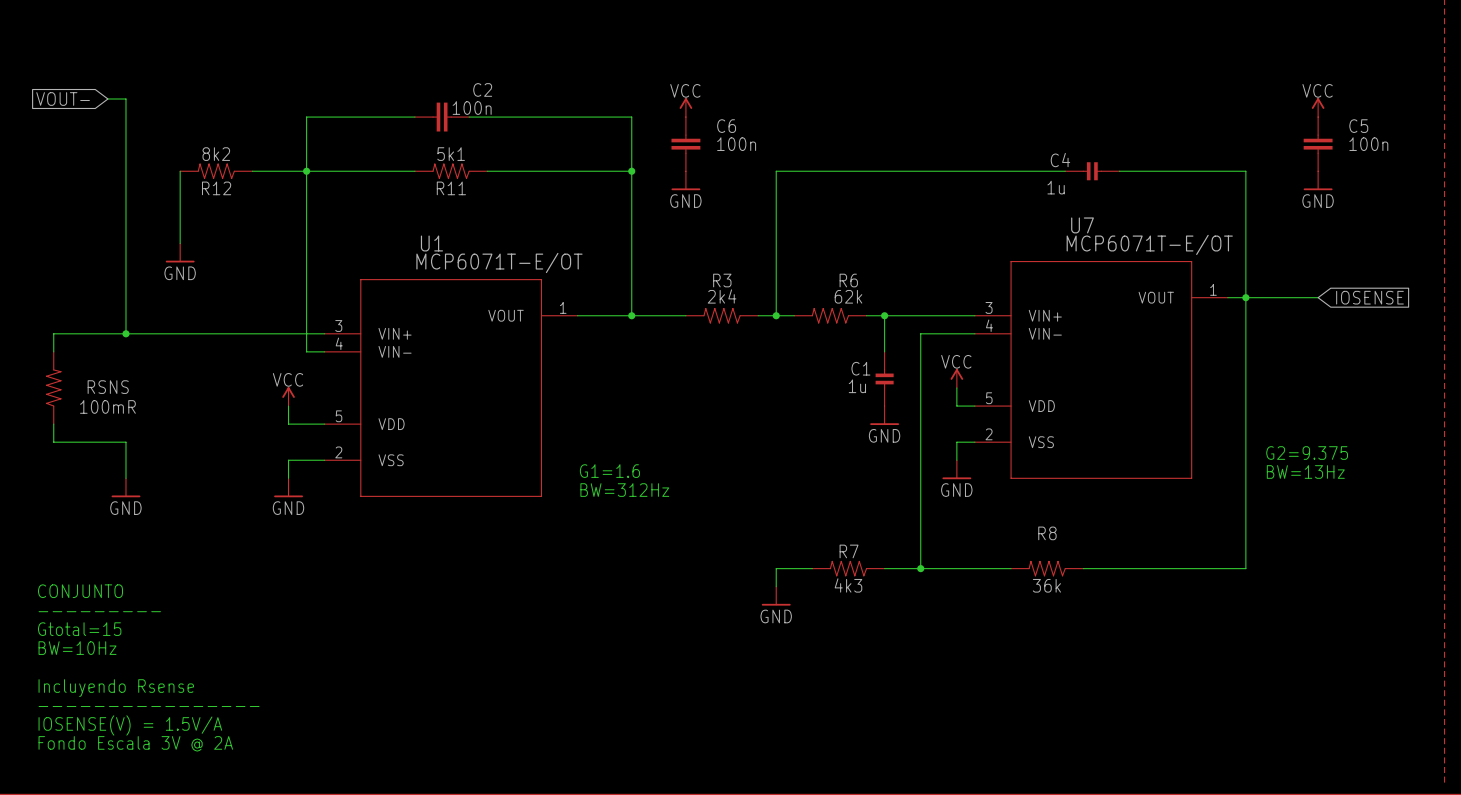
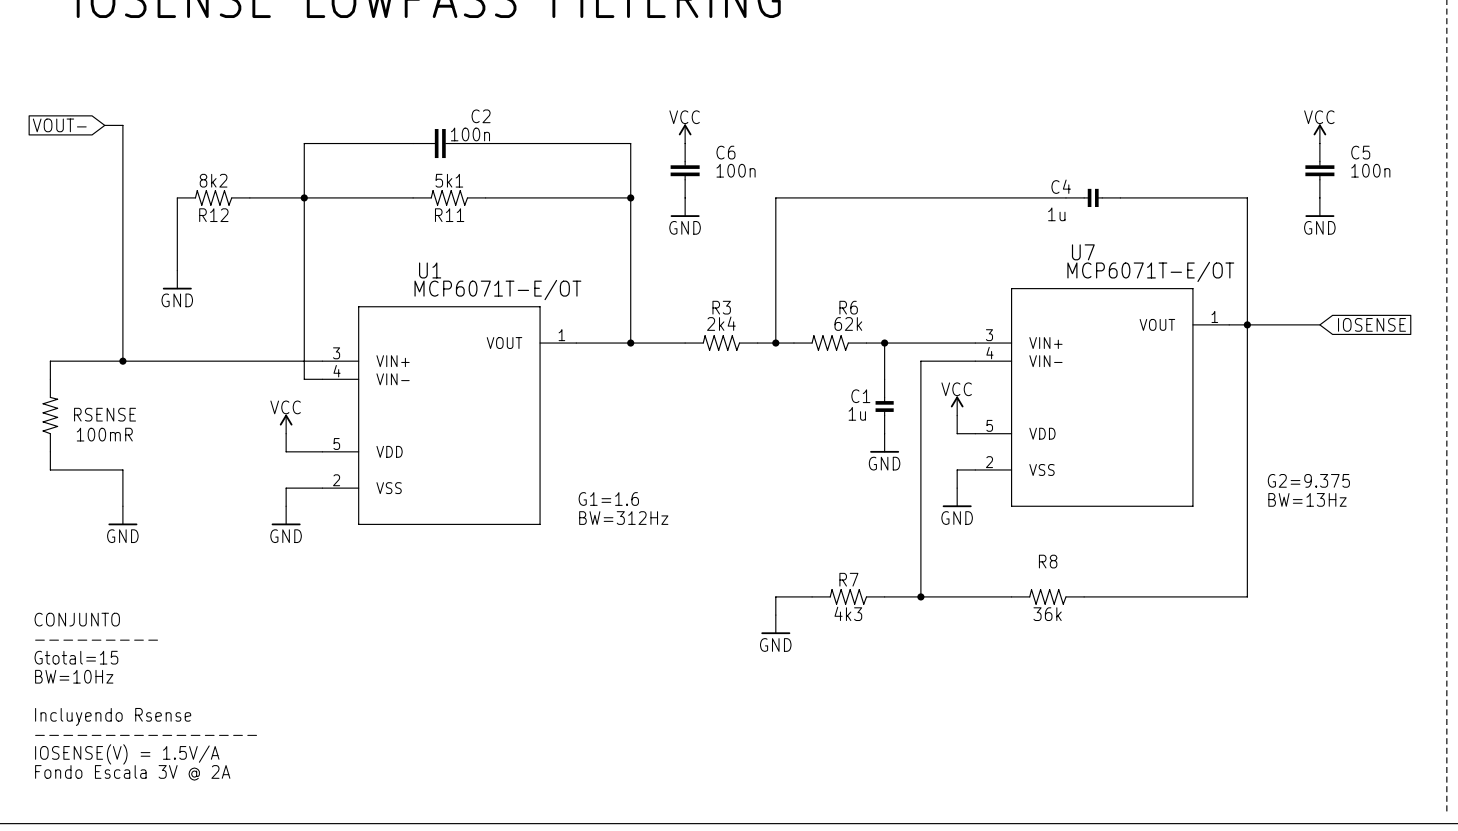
RSNS name: RSNS (108, 387) -> RSENSE (105, 414)

